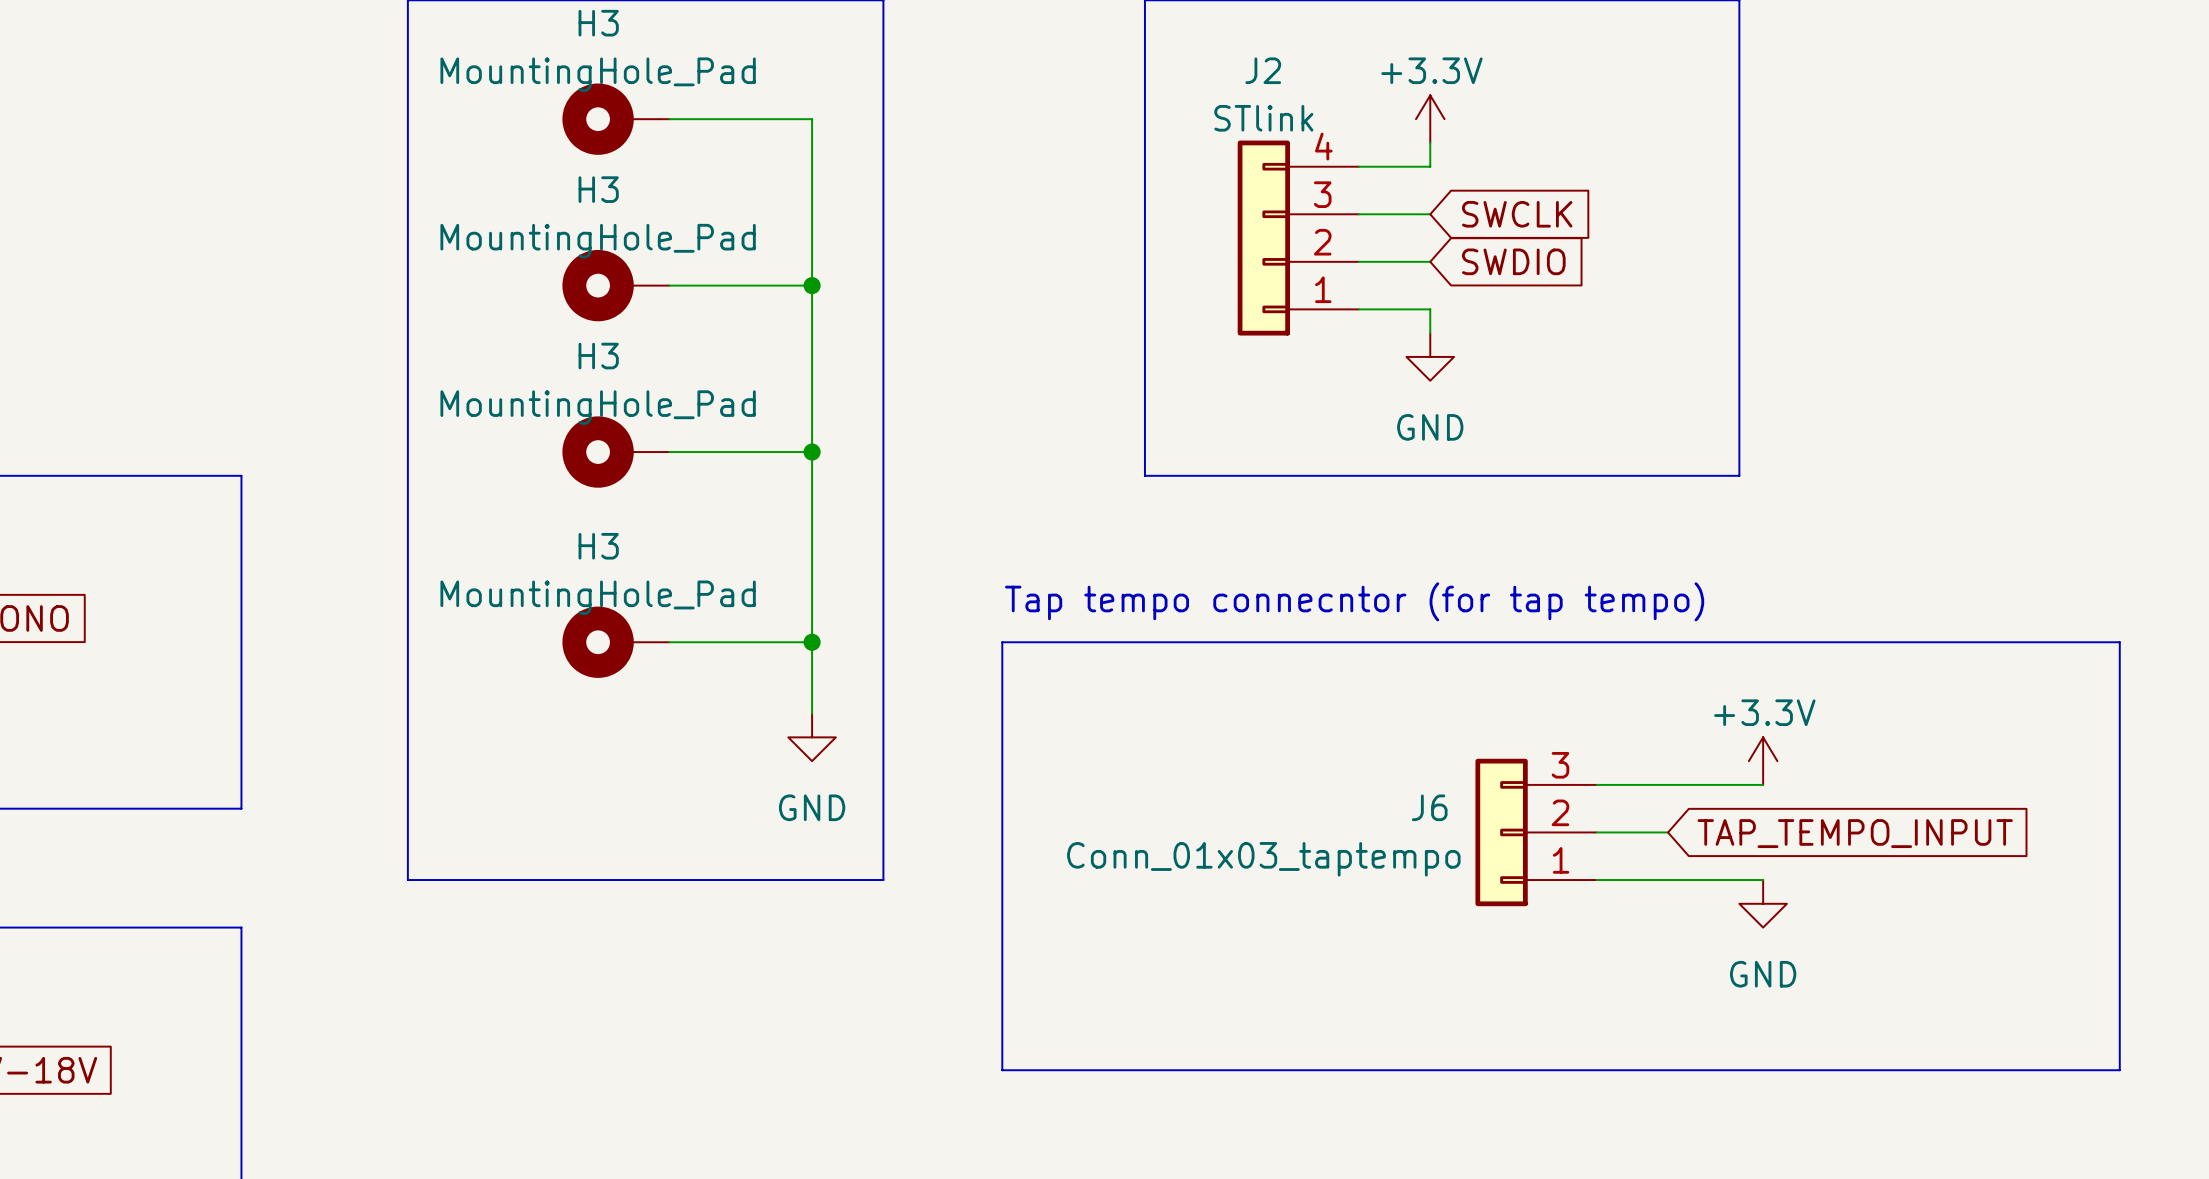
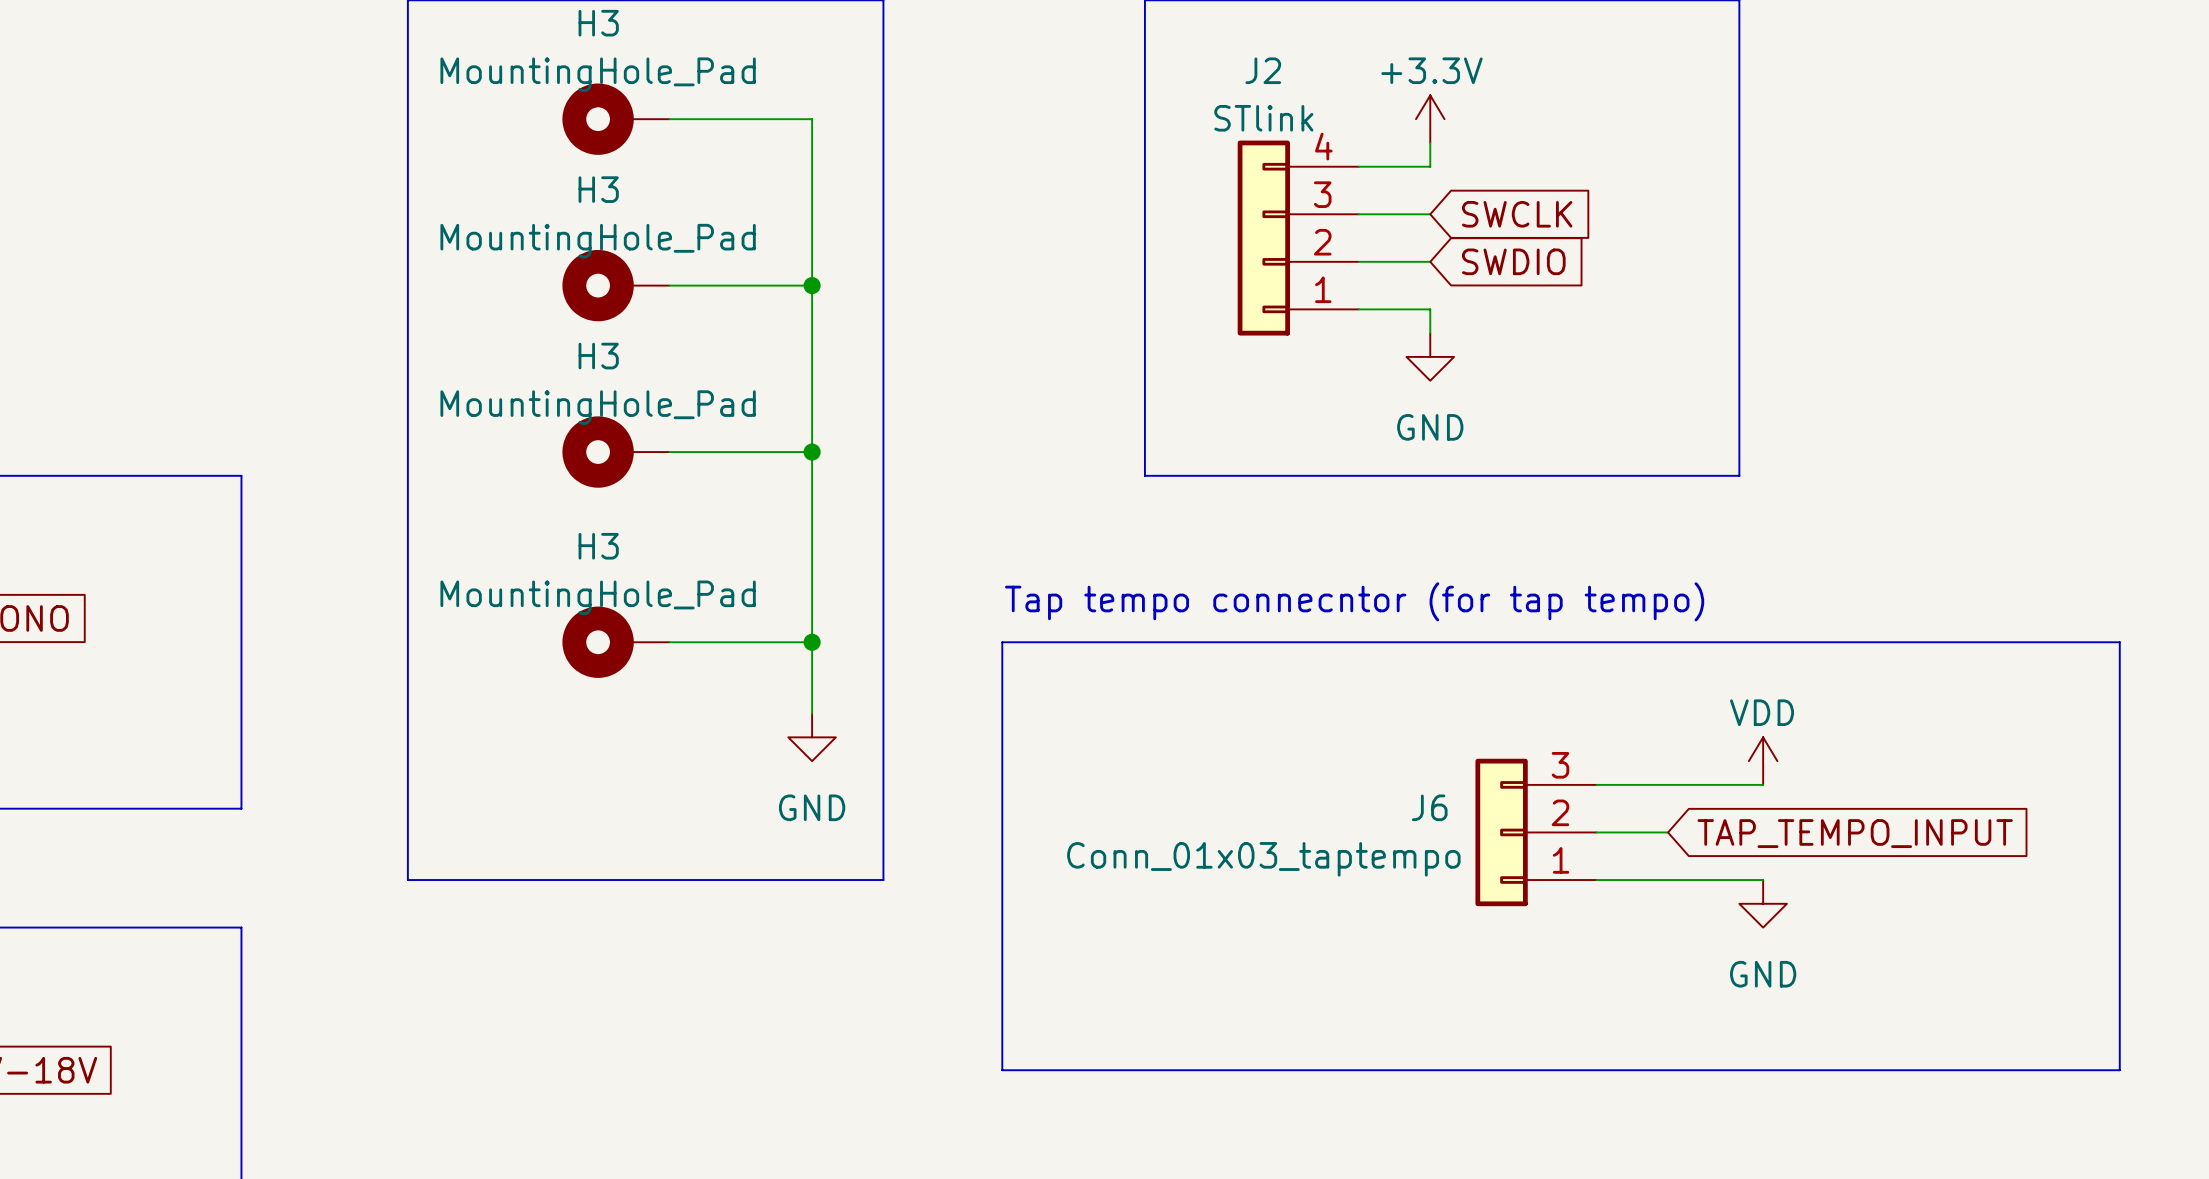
power symbol: +3.3V (1763, 761) -> VDD (1763, 761)

